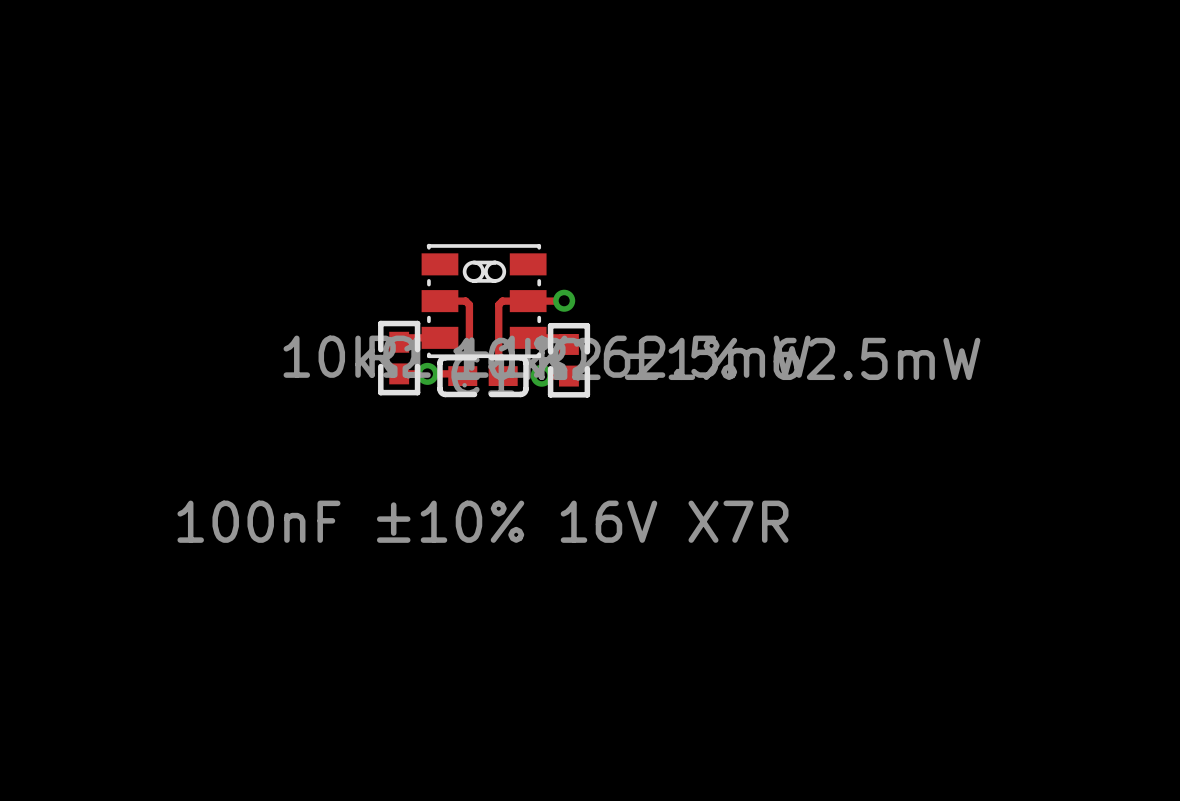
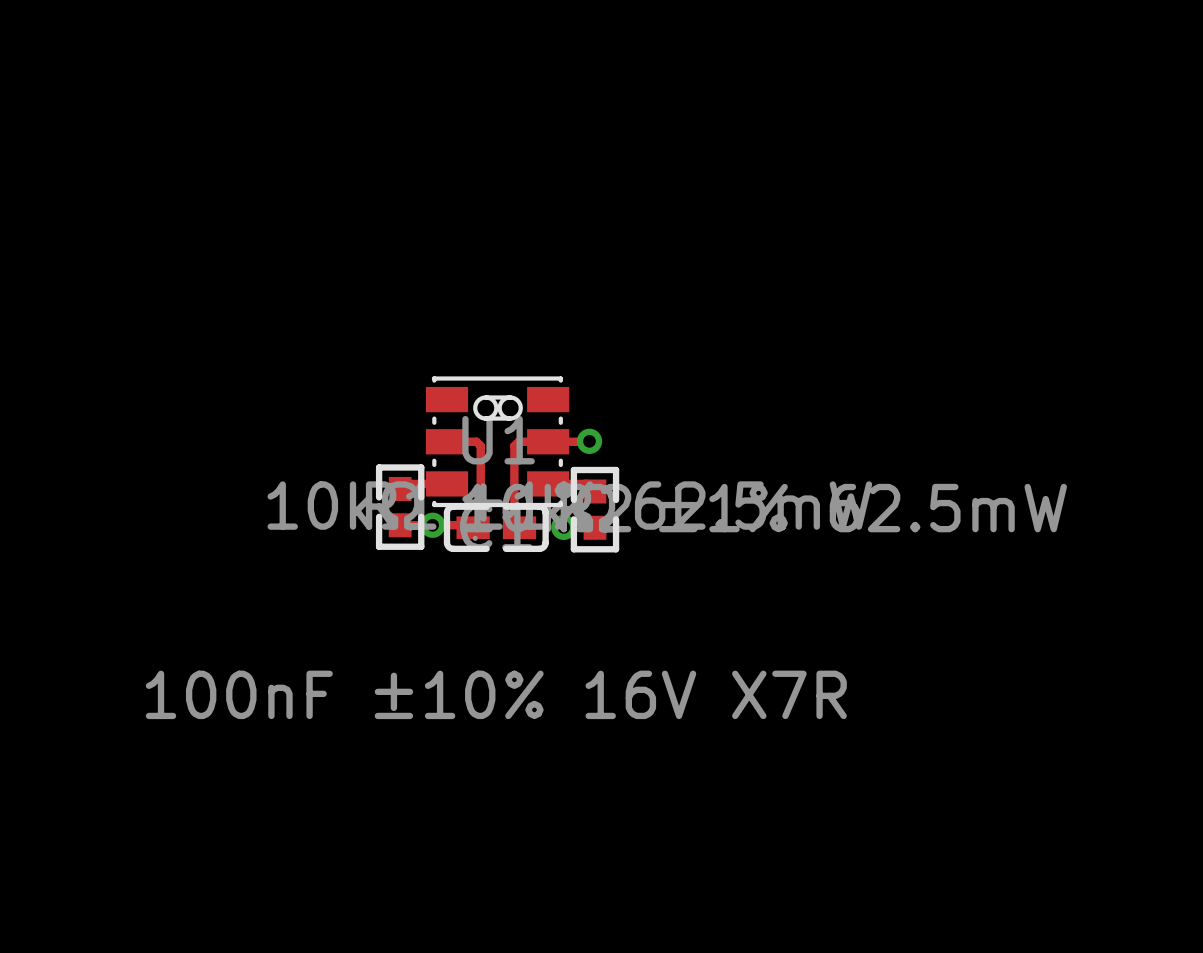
U1 name: none -> U1 (498, 440)

